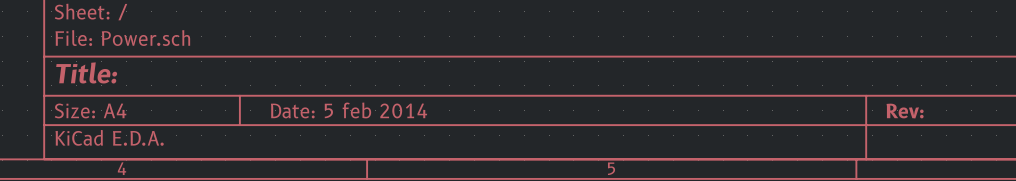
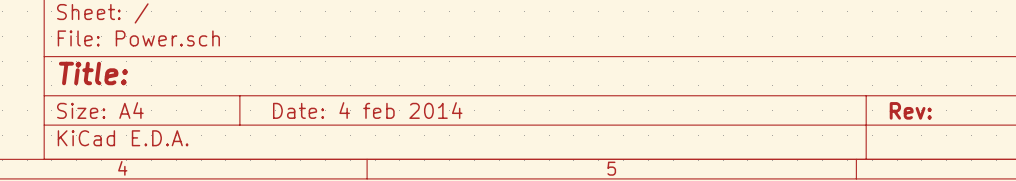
title block: Date: 5 feb 2014 (349, 110) -> Date: 4 feb 2014 (367, 110)

